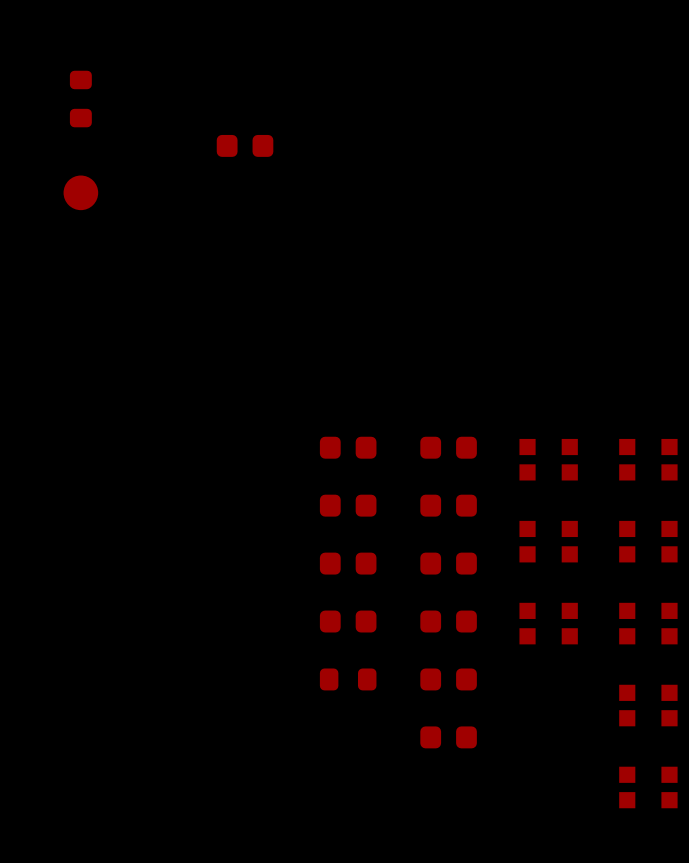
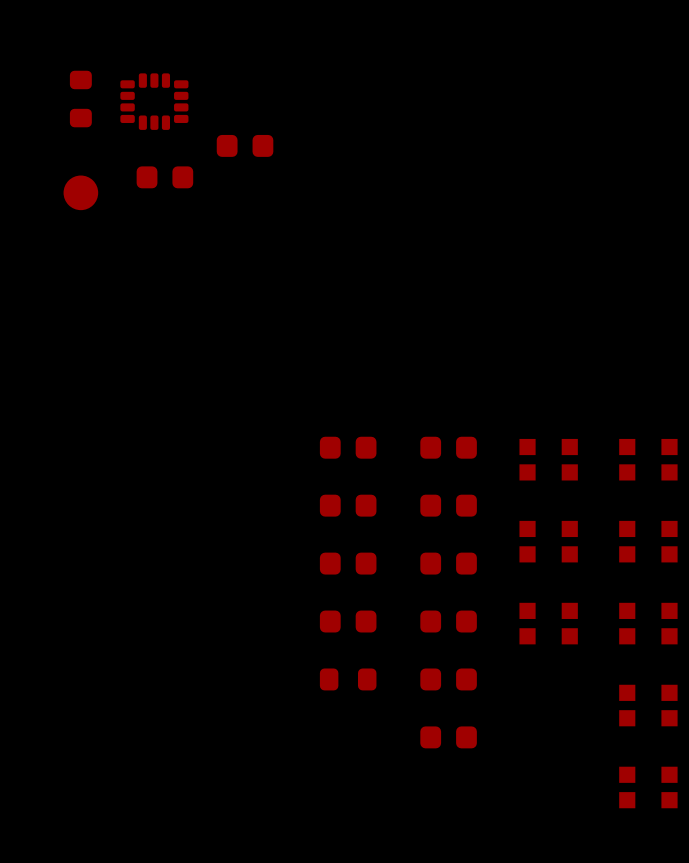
part: none -> (154, 101)
part: none -> (164, 177)

